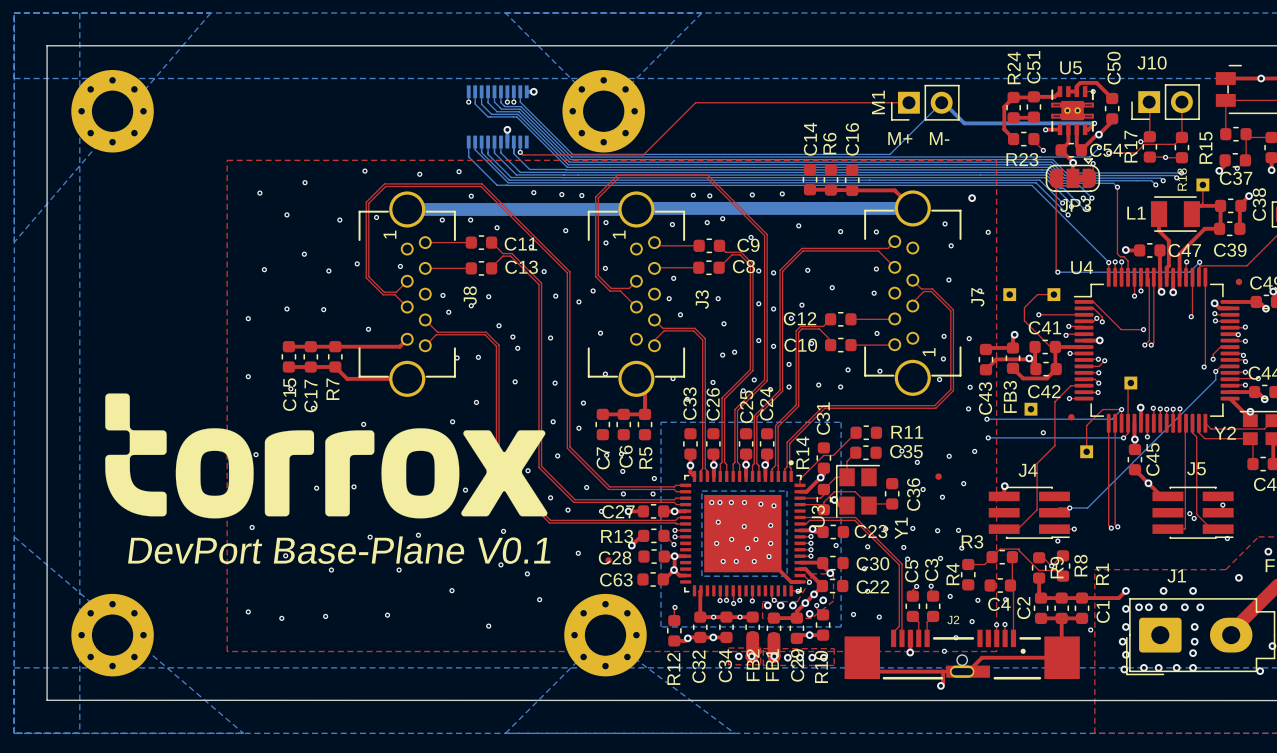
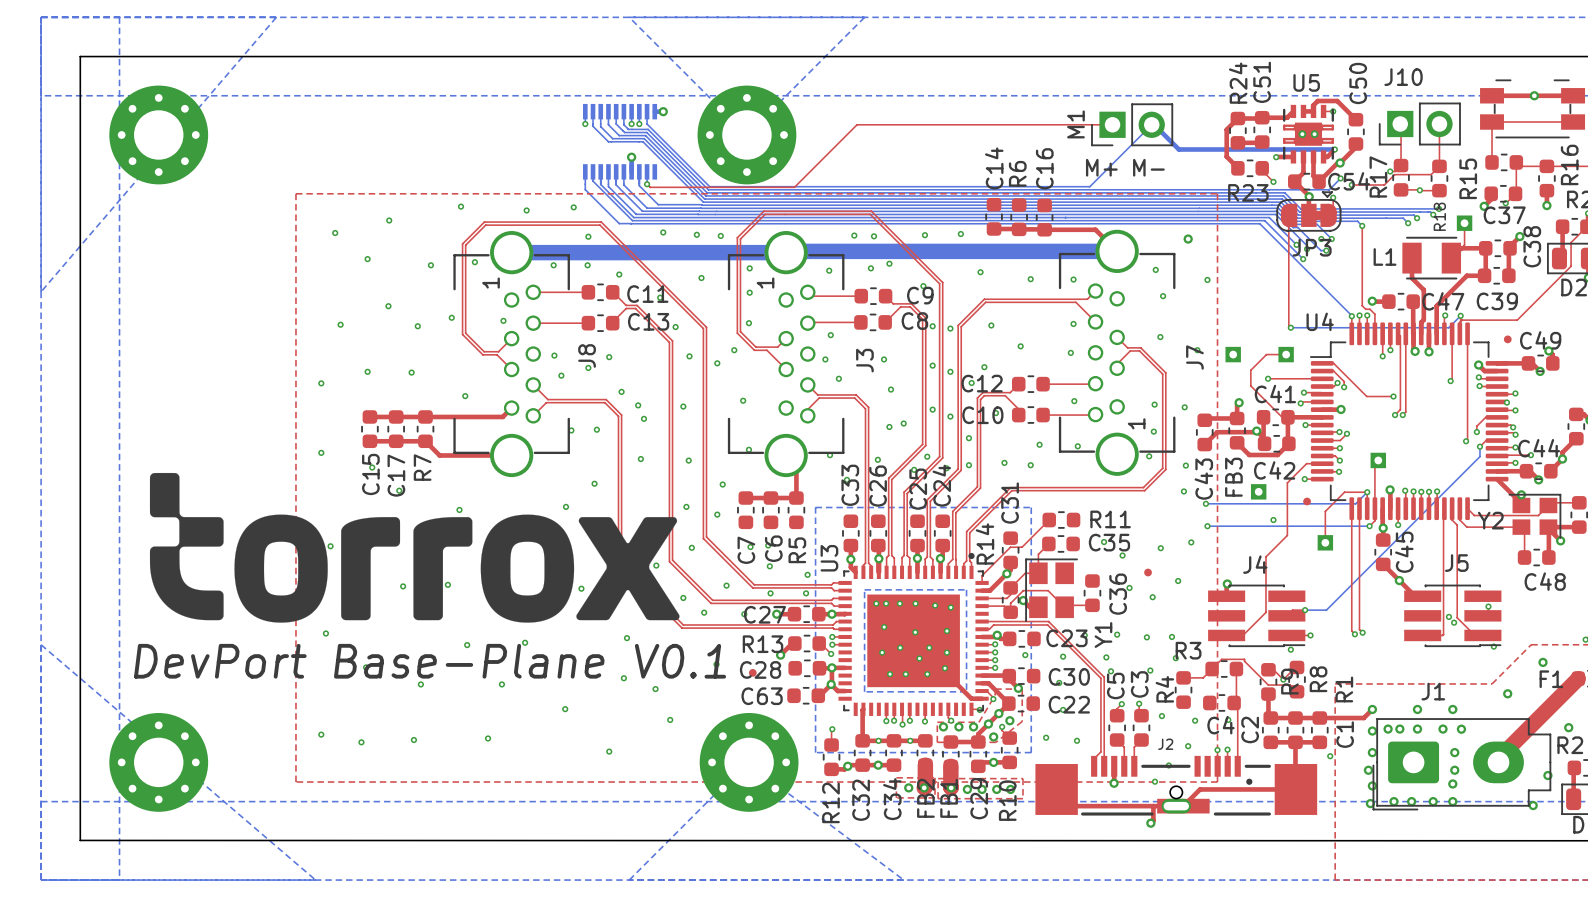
U3 name position: U3 (818, 516) -> U3 (829, 558)

